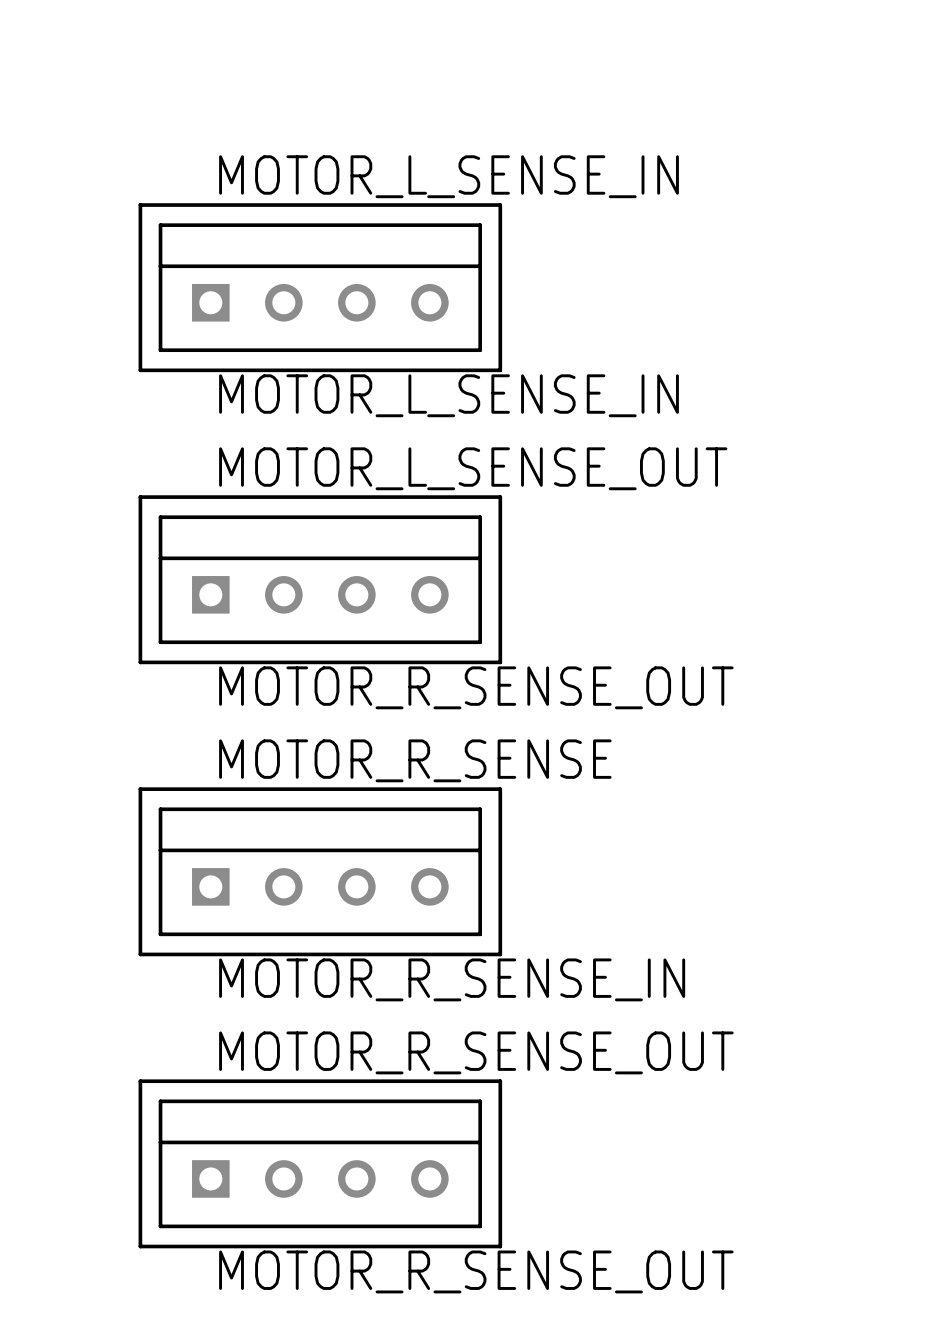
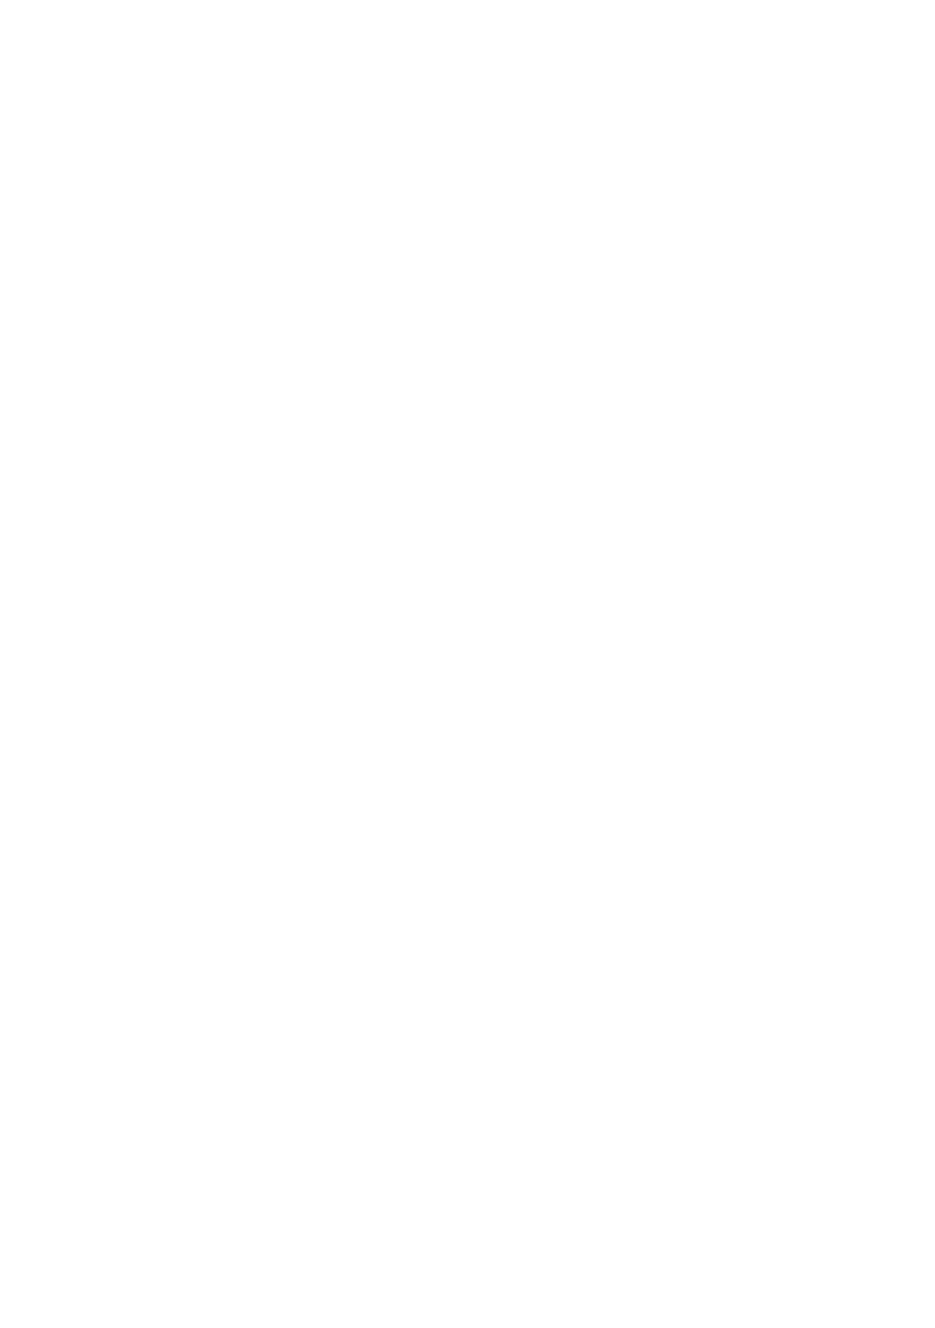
MOTOR_L_SENSE_OUT: MOTOR_R_SENSE_OUT (320, 287) -> none
MOTOR_L_SENSE_IN: MOTOR_L_SENSE_IN (320, 579) -> none
MOTOR_R_SENSE_OUT: MOTOR_R_SENSE_OUT (320, 871) -> none
MOTOR_R_SENSE: MOTOR_R_SENSE_IN (320, 1163) -> none

